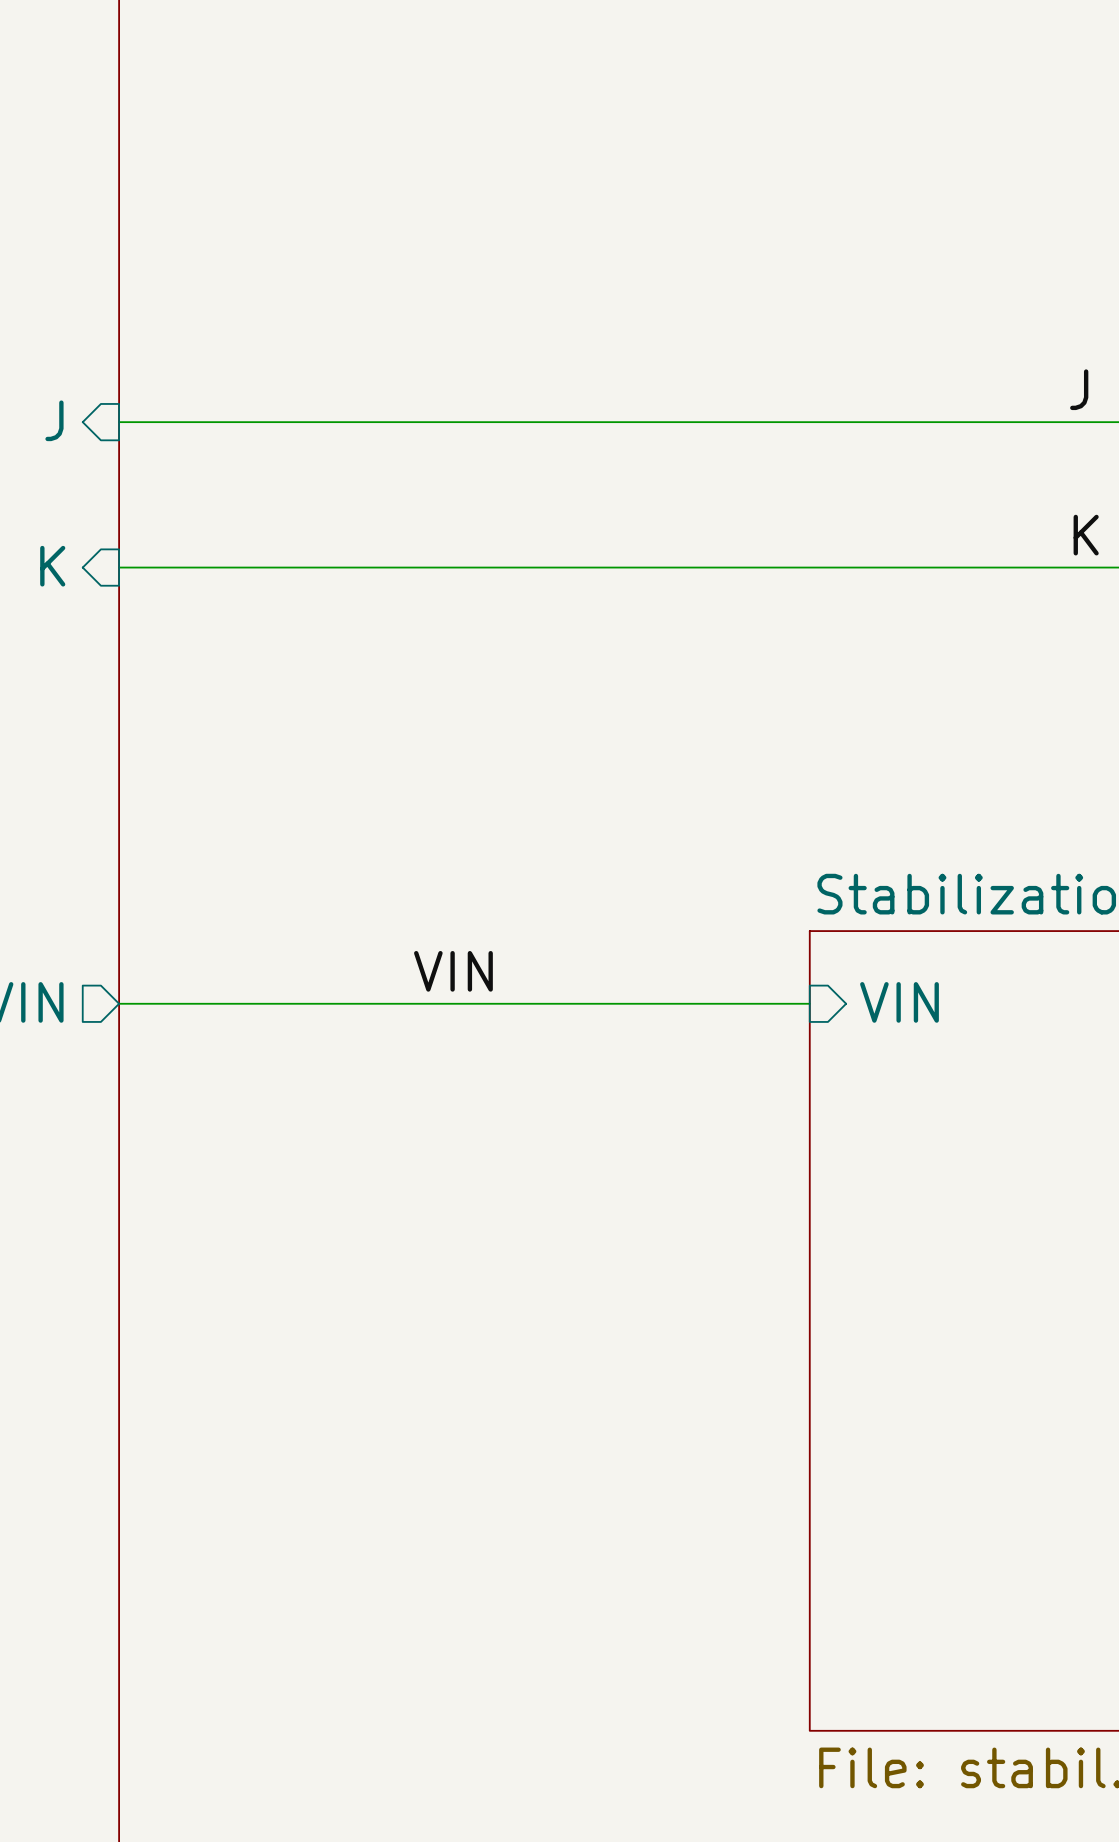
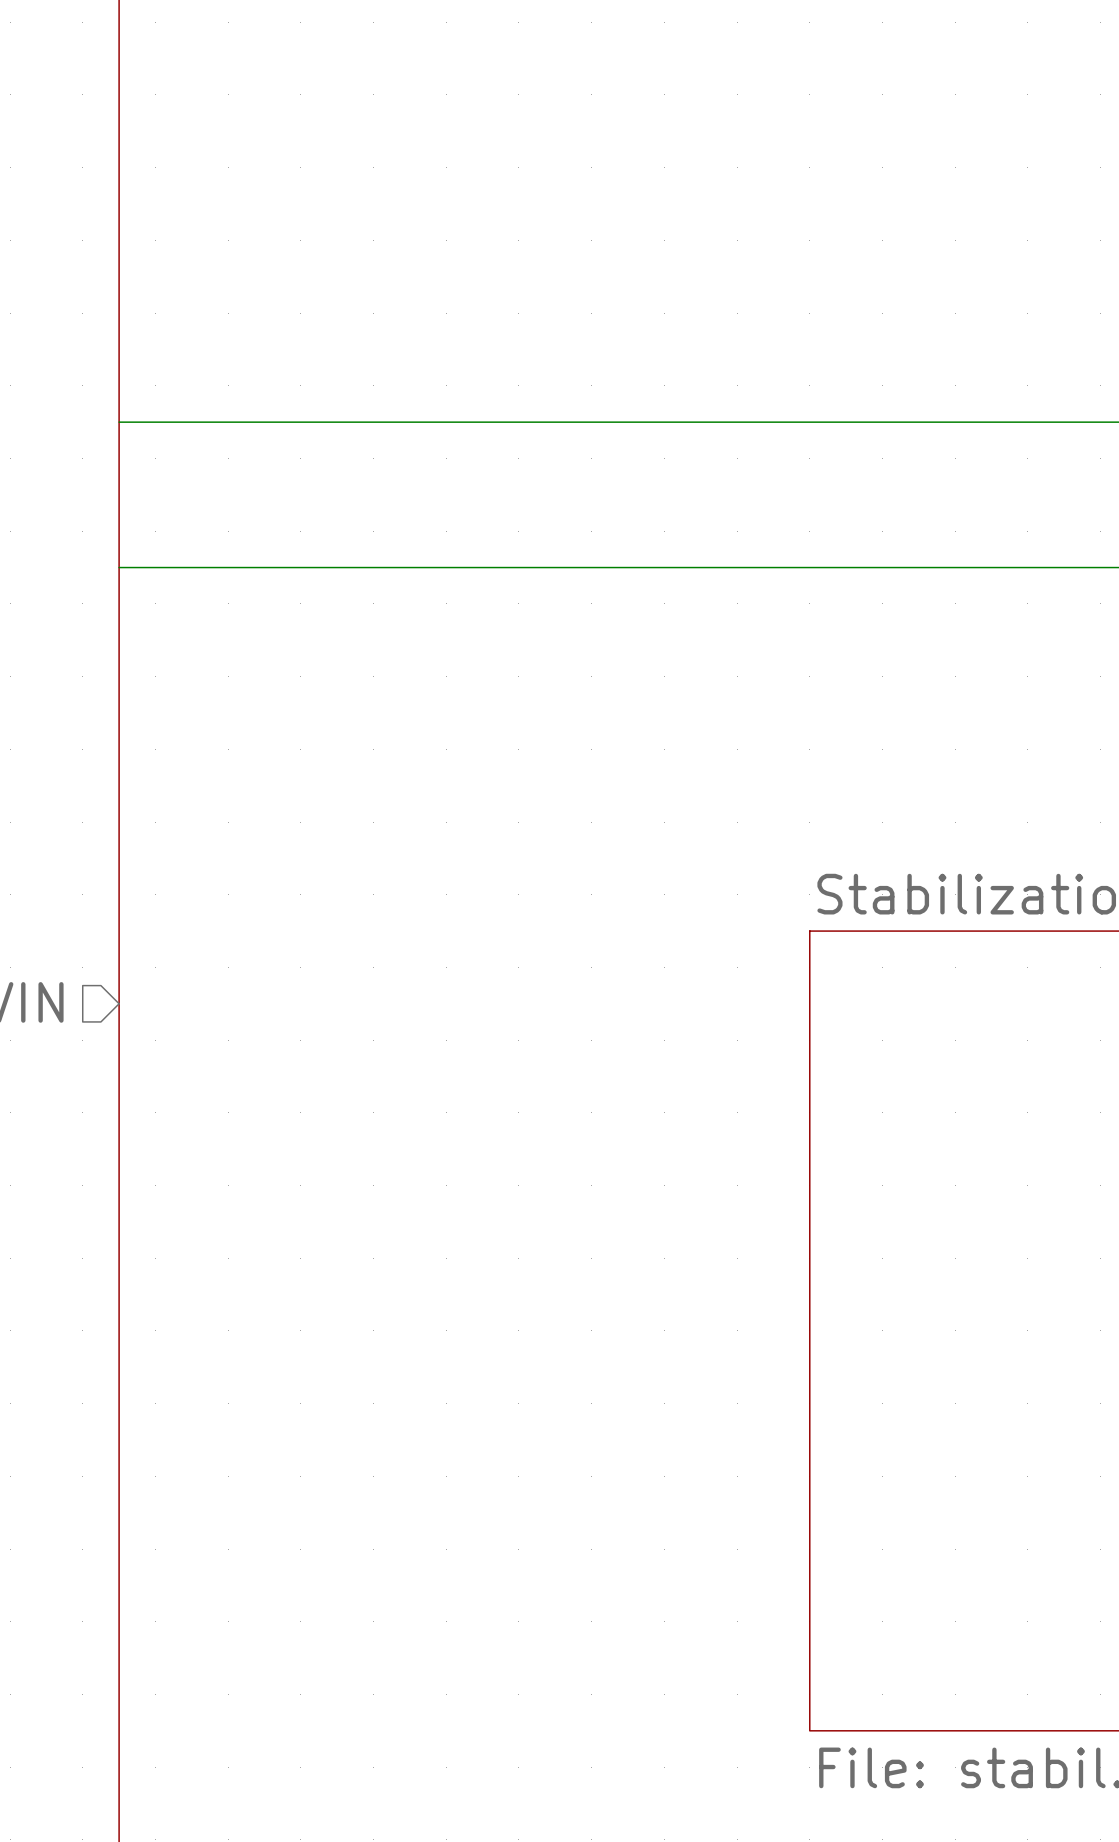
label: J (1079, 389) -> none
sheet pin: J (54, 420) -> none
label: K (1086, 535) -> none
sheet pin: K (52, 566) -> none
label: VIN (453, 971) -> none
sheet pin: VIN (899, 1002) -> none
wire: (119, 1003) (809, 1003) -> none

